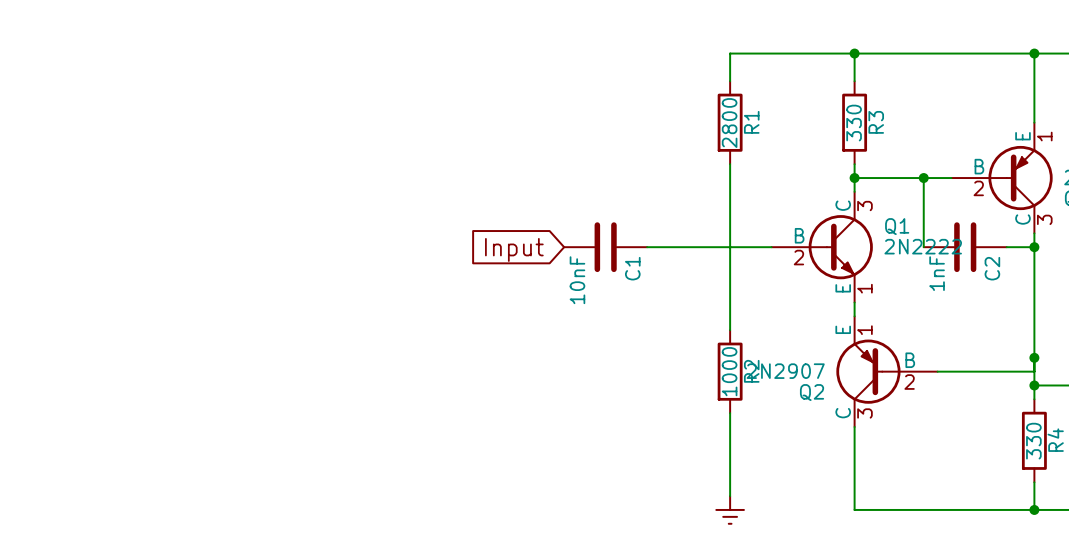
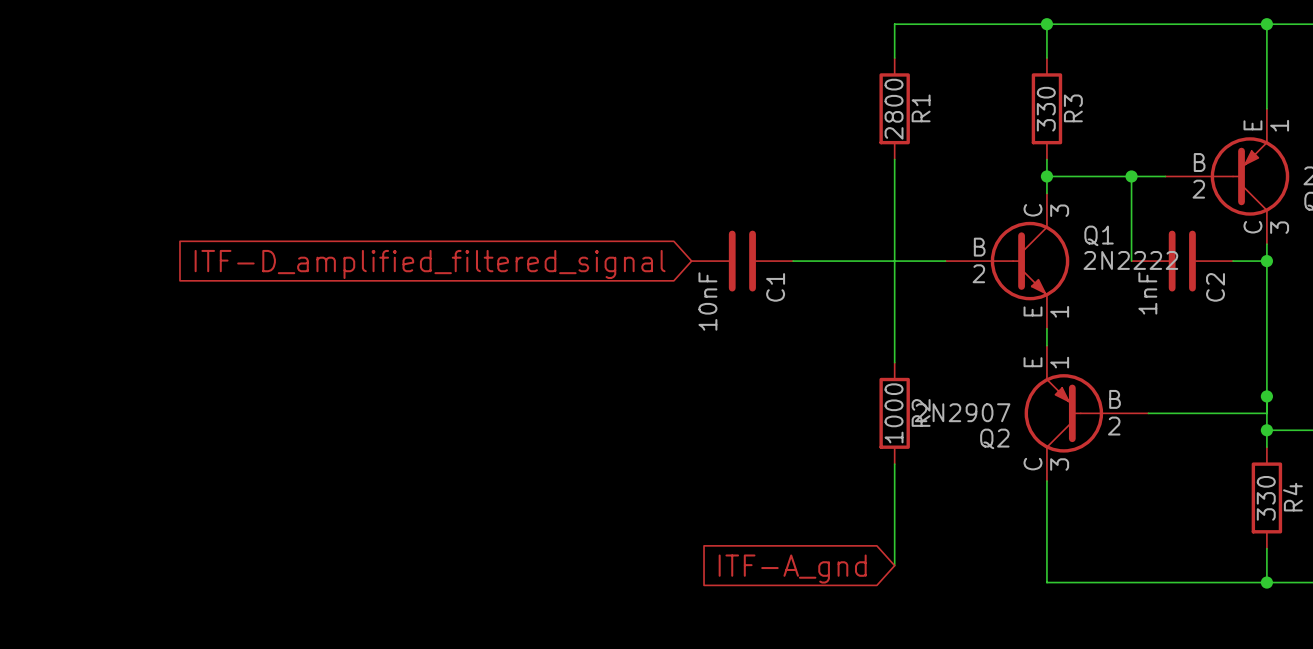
global label: Input (514, 249) -> ITF-D_amplified_filtered_signal (430, 264)
global label: none -> ITF-A_gnd (792, 569)
power symbol: (730, 509) -> none

